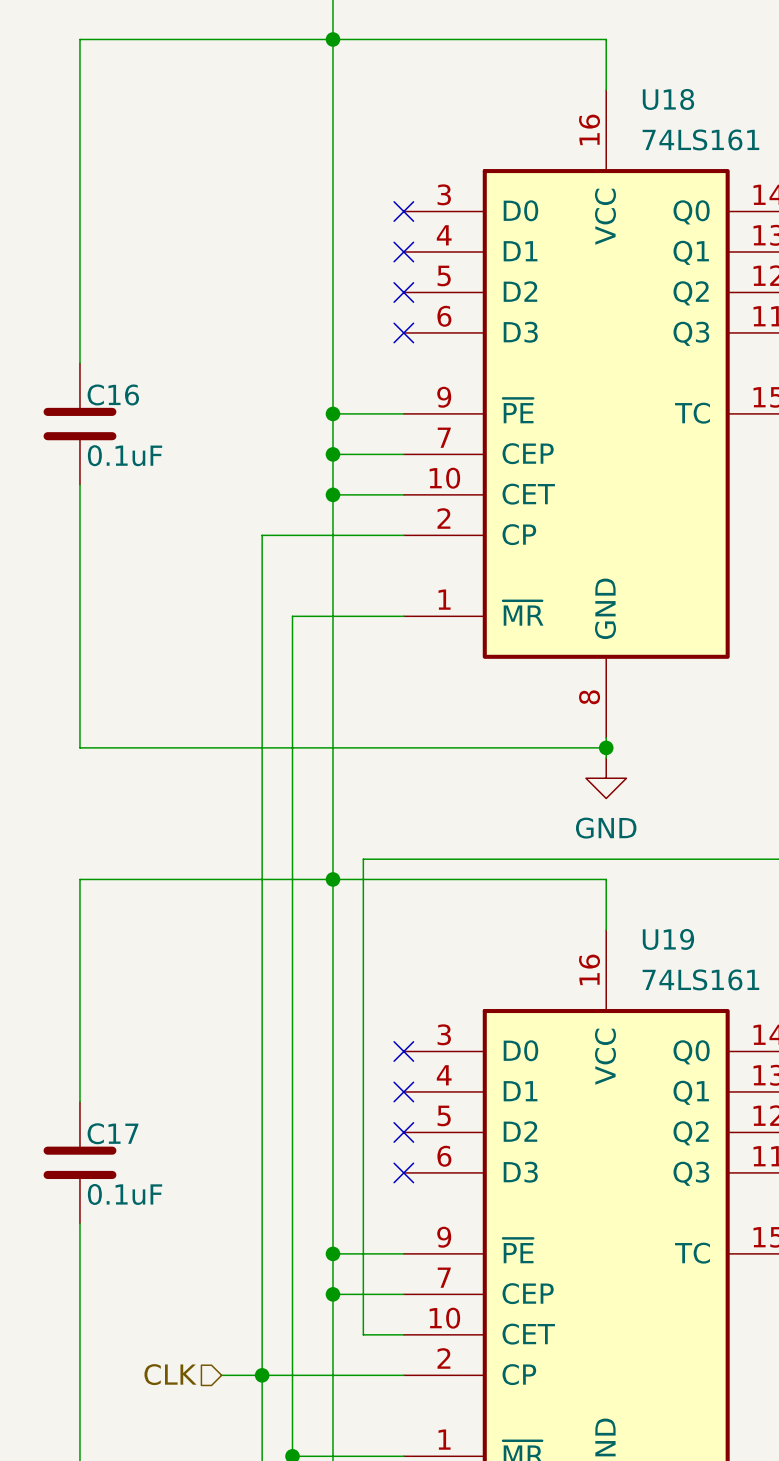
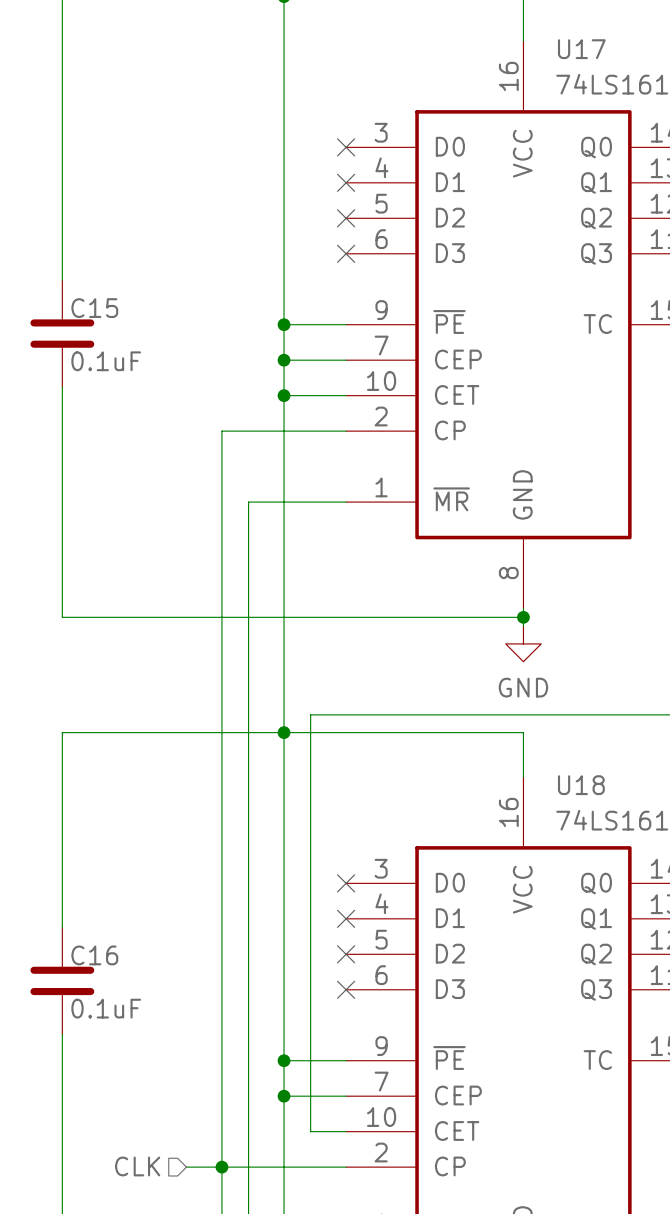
U18 name: U18 (668, 99) -> U17 (581, 49)
C16 name: C16 (113, 394) -> C15 (94, 308)
U19 name: U19 (668, 939) -> U18 (581, 785)
C17 name: C17 (113, 1133) -> C16 (94, 955)

